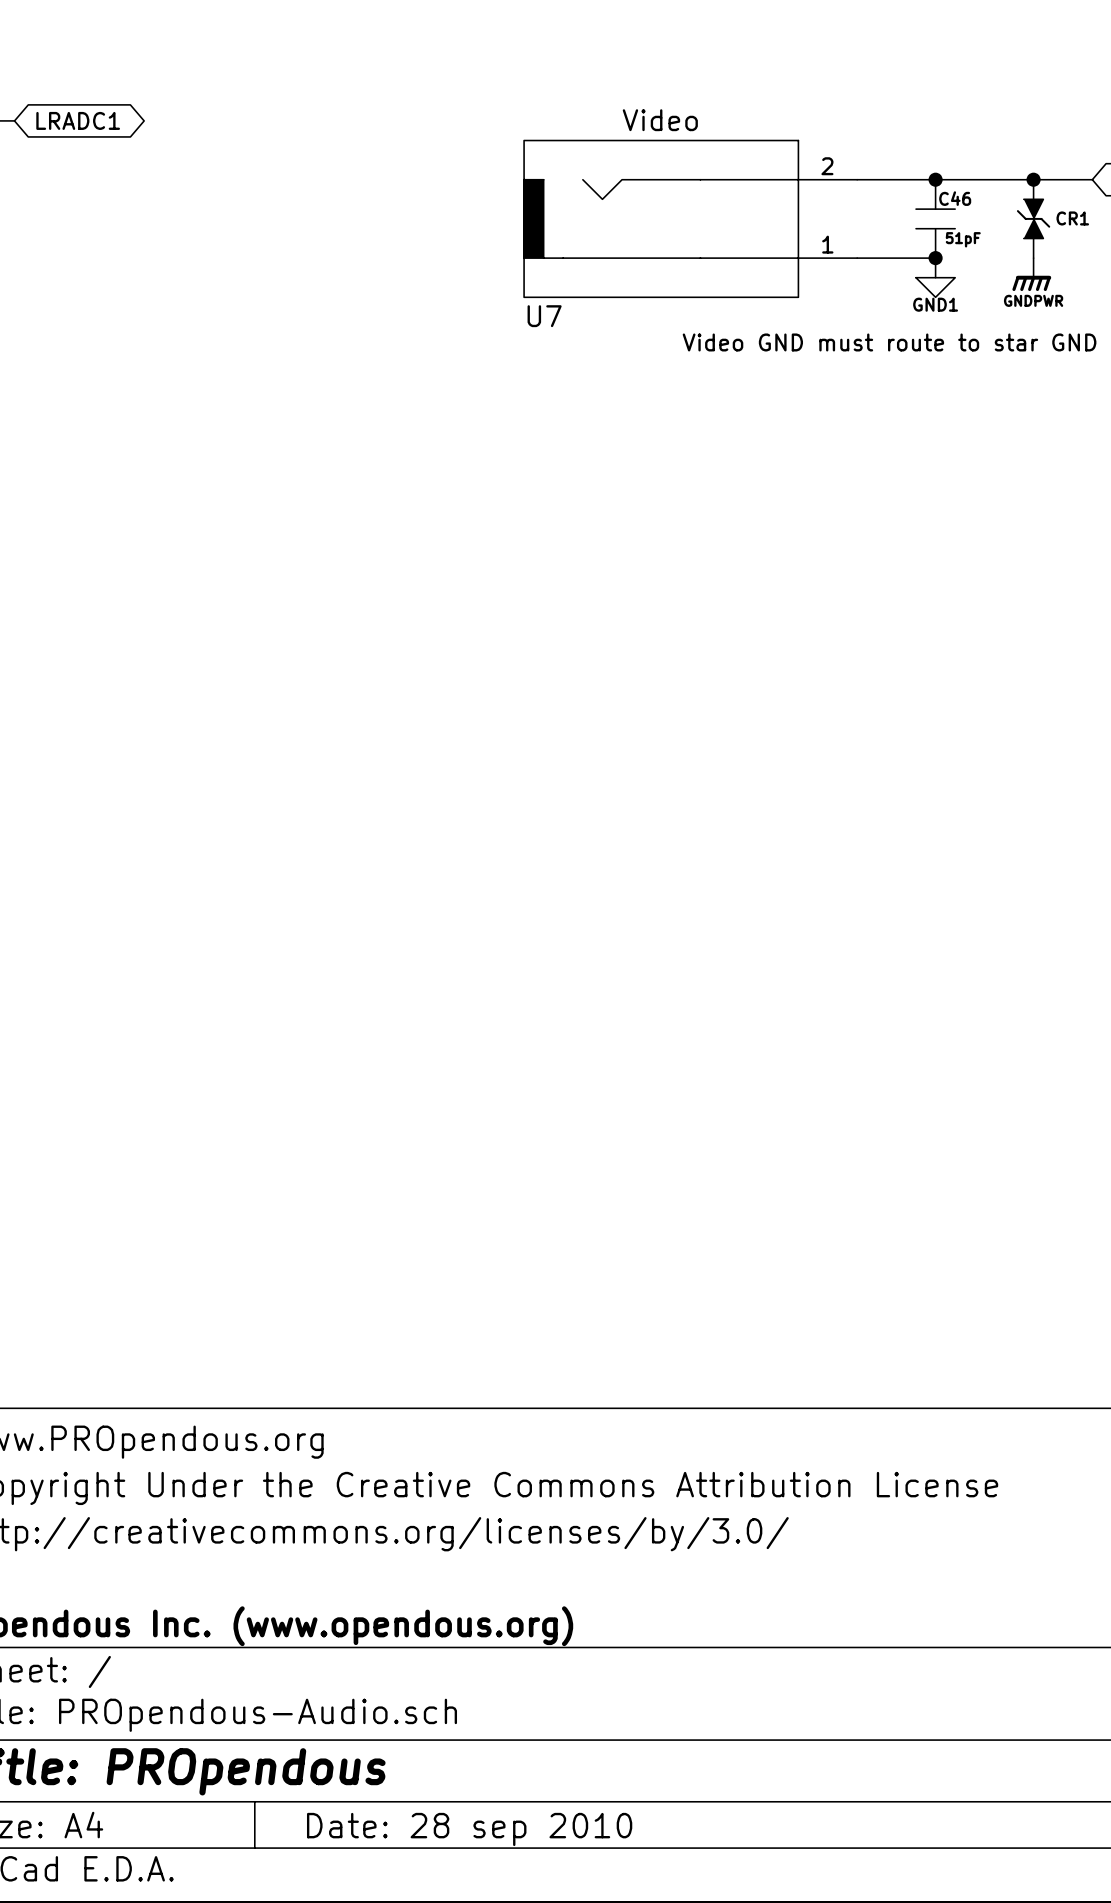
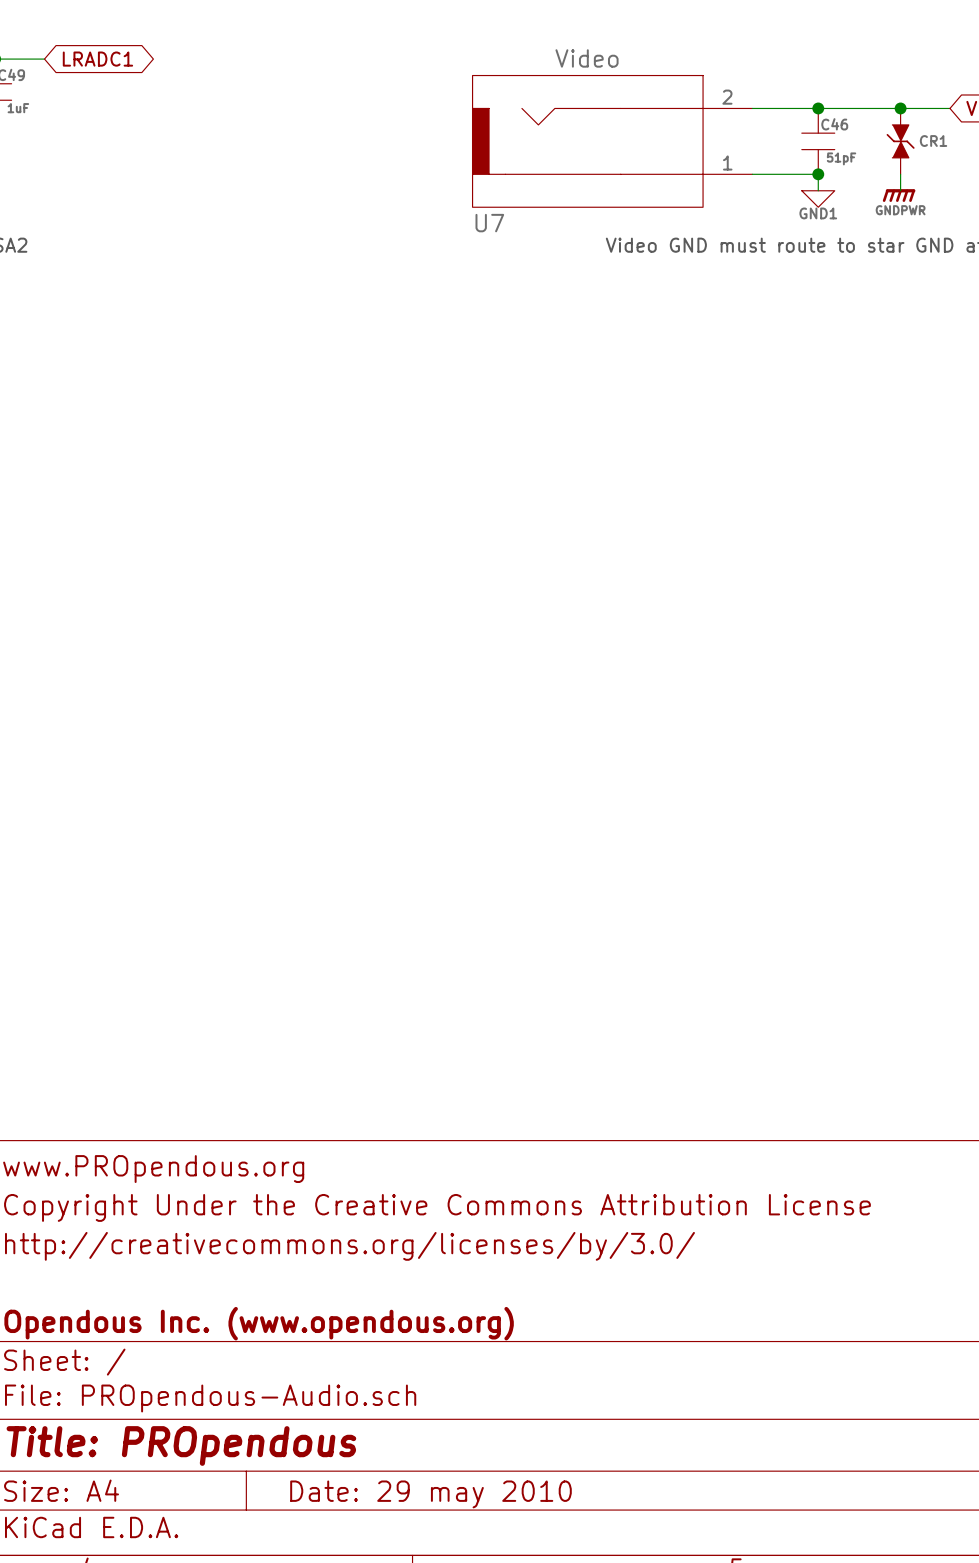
title block: Date: 28 sep 2010 (469, 1829) -> Date: 29 may 2010 (430, 1494)

